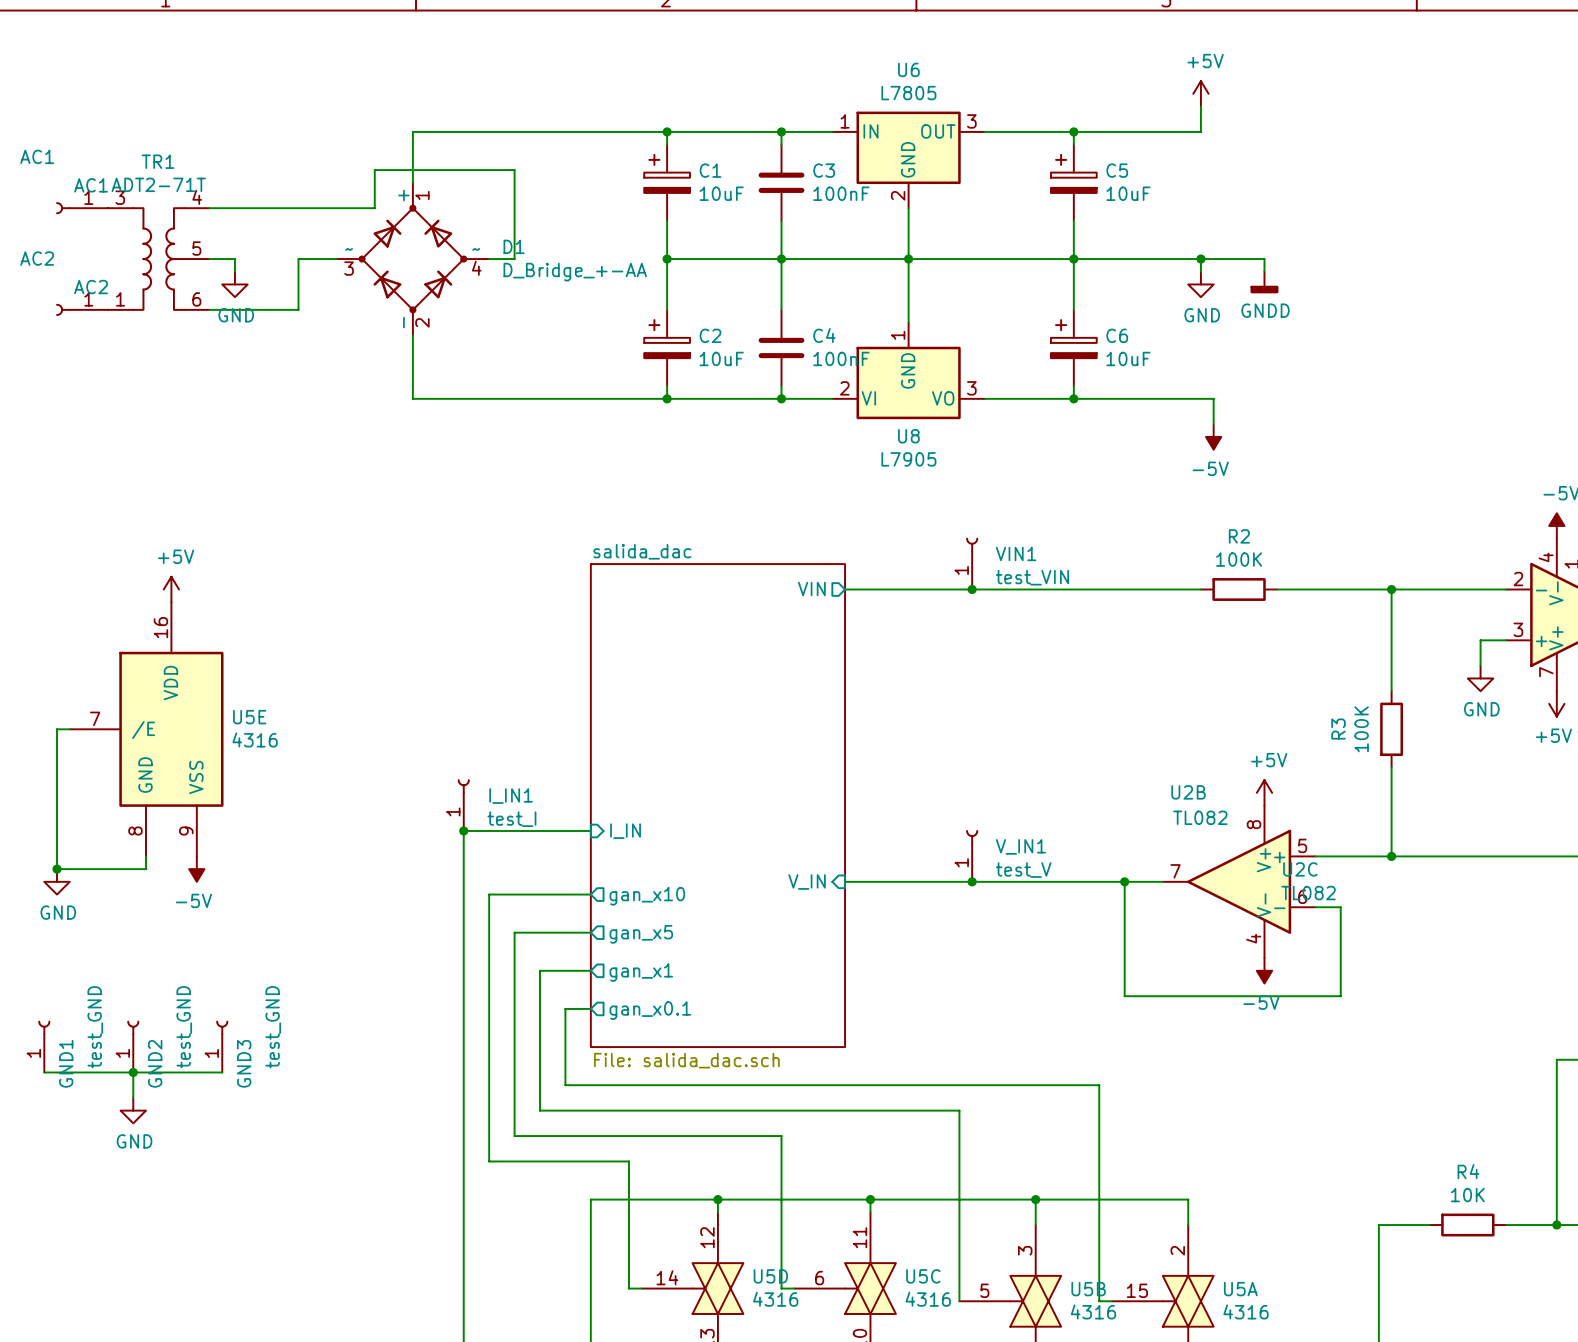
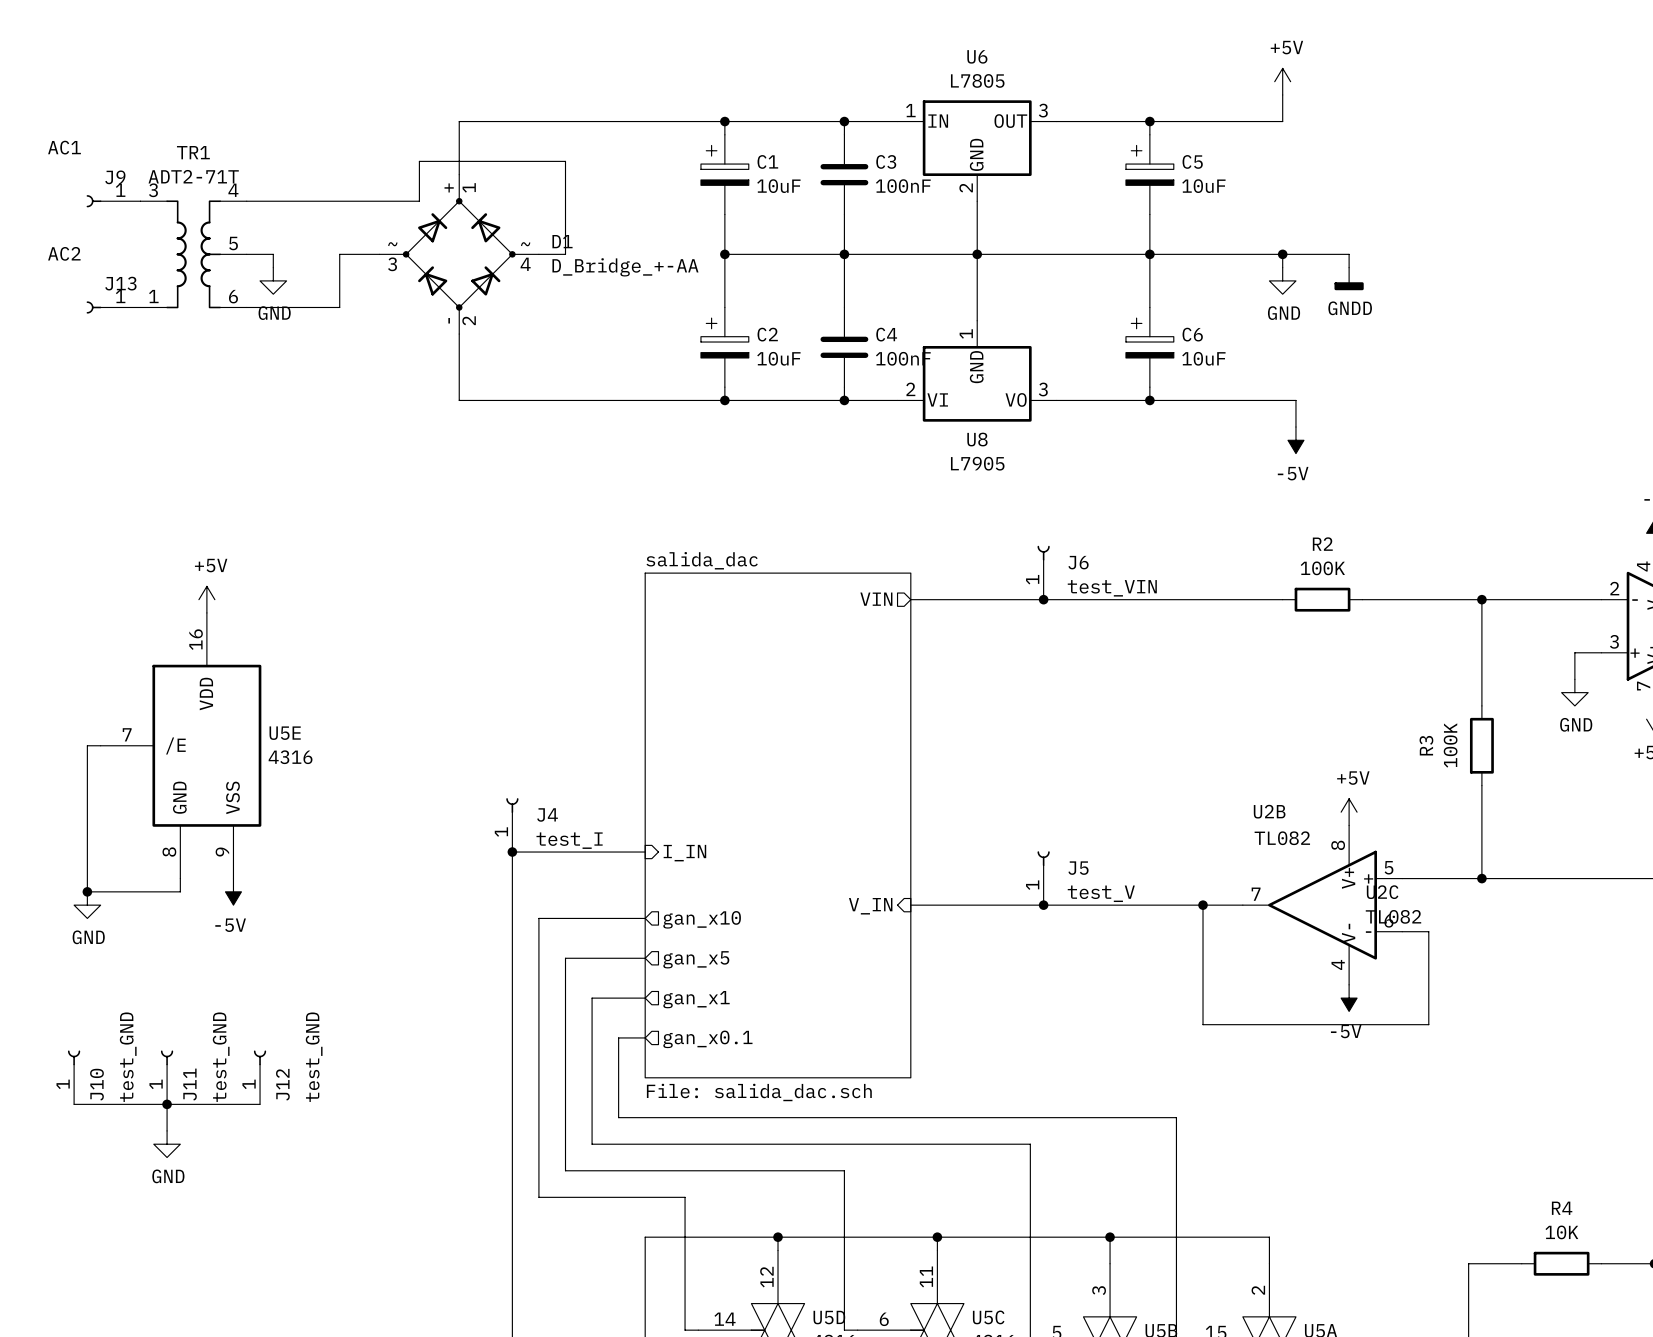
AC1 name: AC1 (91, 185) -> J9 (115, 177)
AC2 name: AC2 (91, 287) -> J13 (120, 283)
VIN1 name: VIN1 (1016, 553) -> J6 (1078, 562)
I_IN1 name: I_IN1 (511, 796) -> J4 (547, 814)
V_IN1 name: V_IN1 (1020, 846) -> J5 (1078, 868)
GND1 name: GND1 (66, 1063) -> J10 (96, 1084)
GND2 name: GND2 (155, 1063) -> J11 (190, 1084)
GND3 name: GND3 (244, 1063) -> J12 (282, 1084)

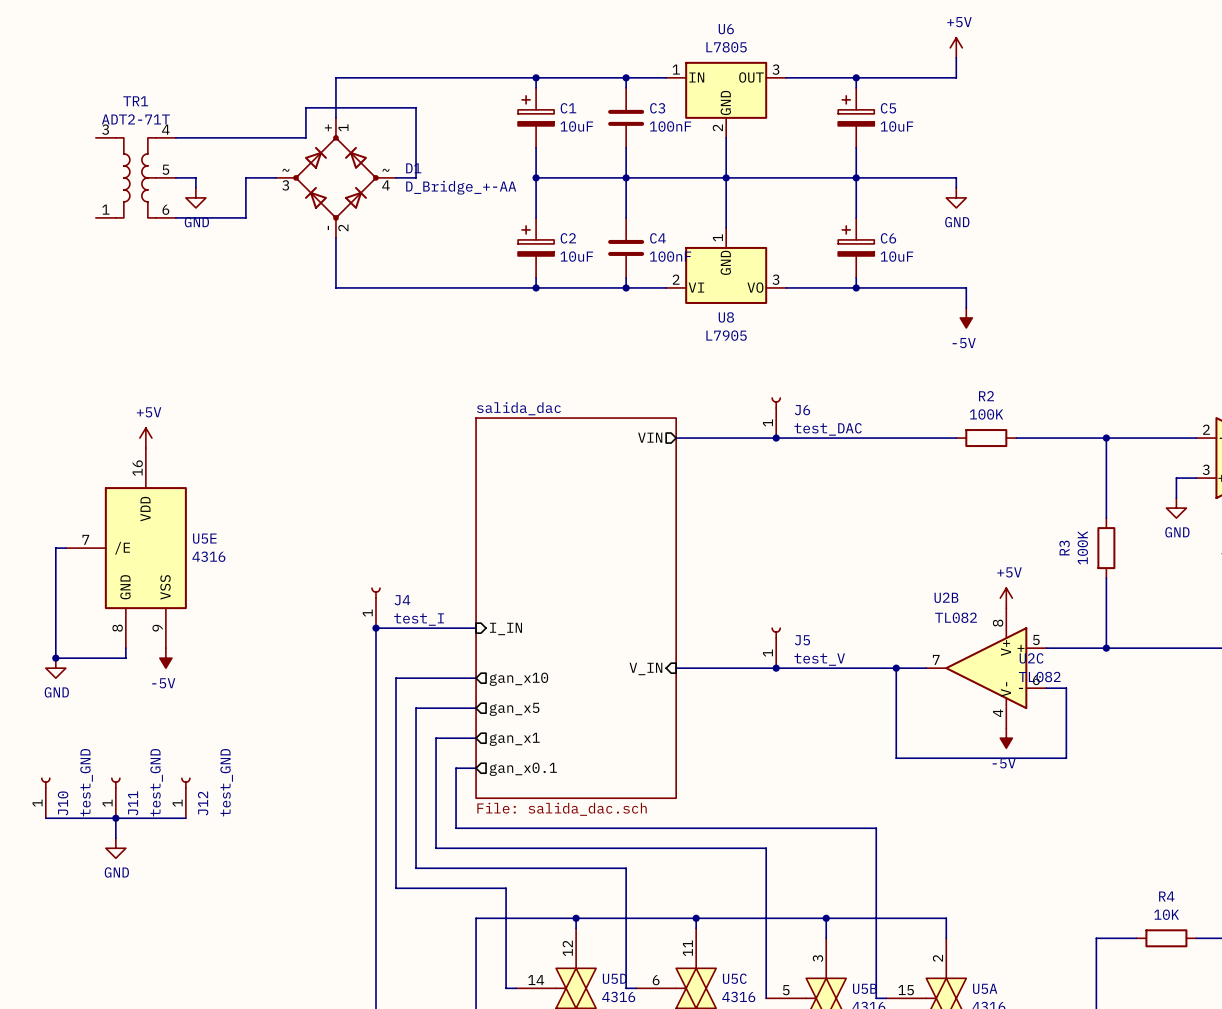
J9: AC1 (113, 201) -> none
wire: (1282, 254) (1349, 254) (1349, 267) -> none
junction: (1282, 254) -> none
power symbol: GNDD (1349, 278) -> none
J13: AC2 (113, 307) -> none
J6 value: test_VIN (1112, 588) -> test_DAC (828, 429)

